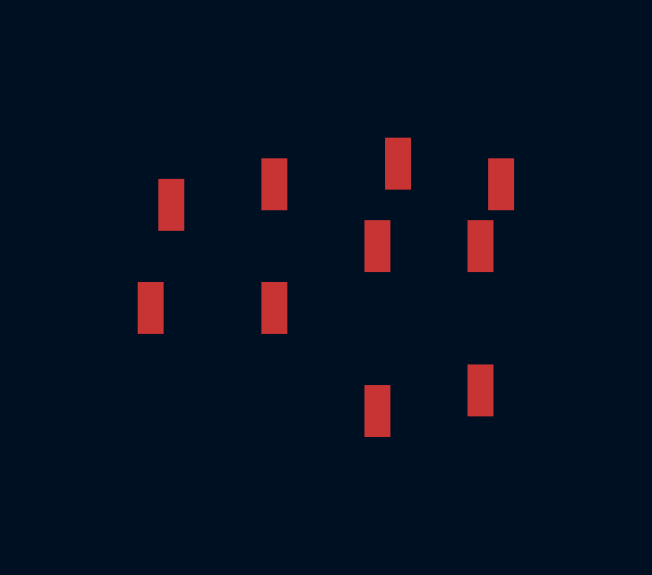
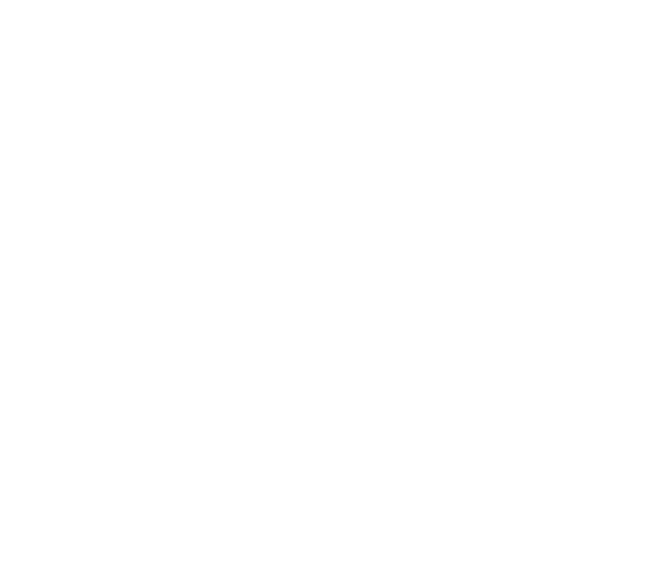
part: (398, 163) -> none
part: (274, 184) -> none
part: (501, 184) -> none
part: (171, 204) -> none
part: (377, 246) -> none
part: (480, 246) -> none
part: (150, 307) -> none
part: (274, 307) -> none
part: (480, 390) -> none
part: (377, 411) -> none

